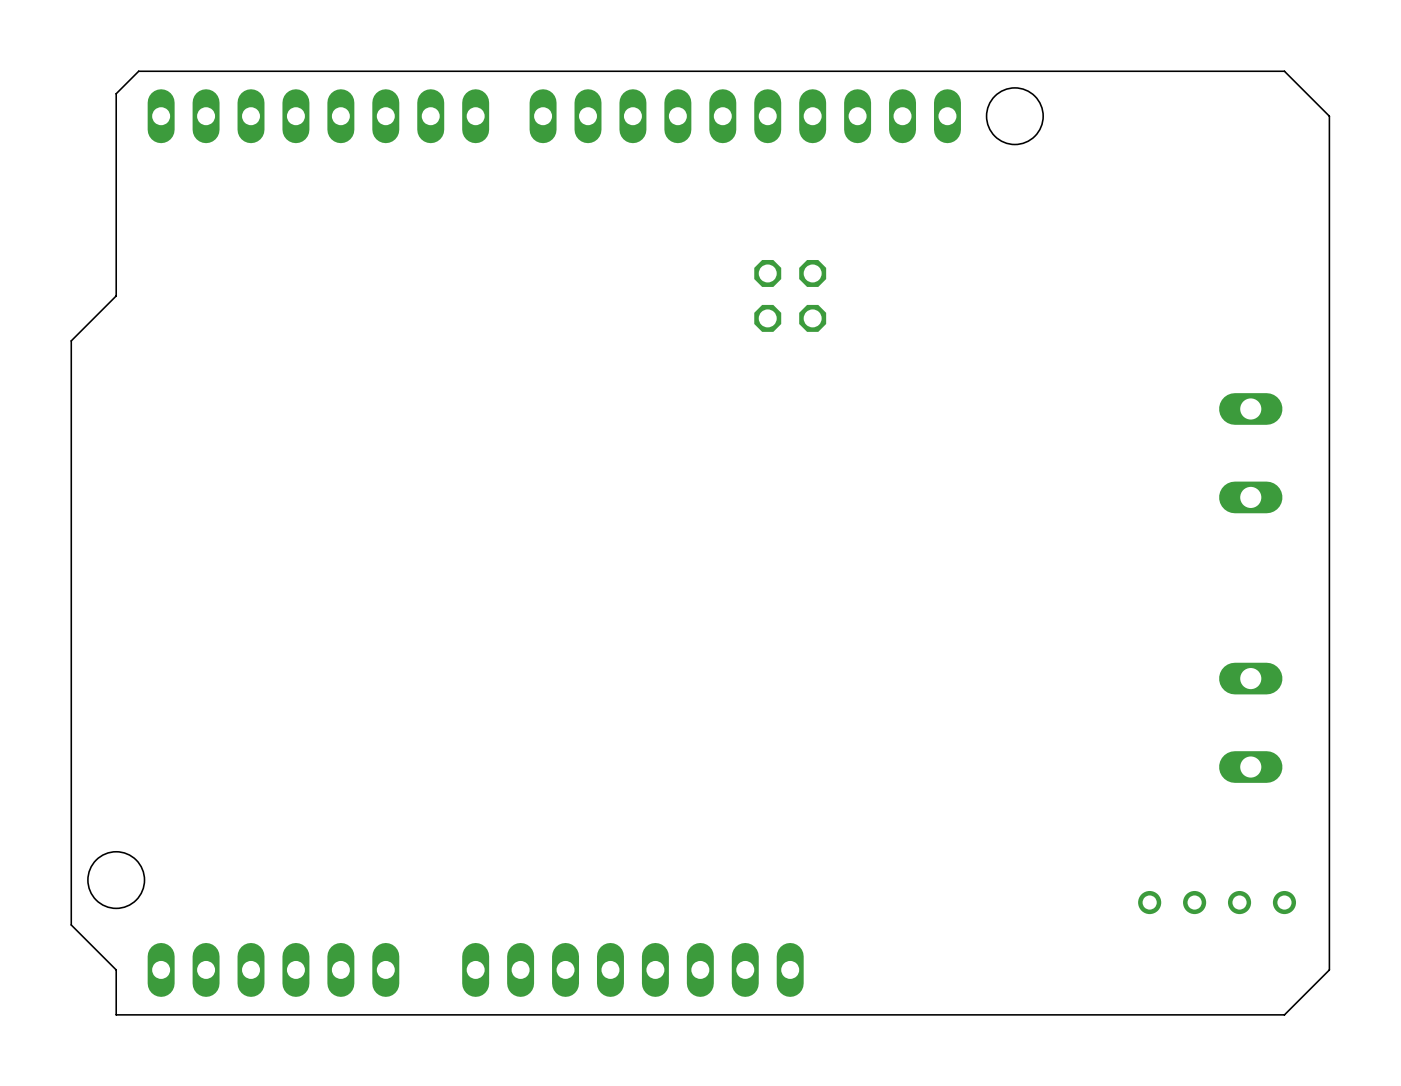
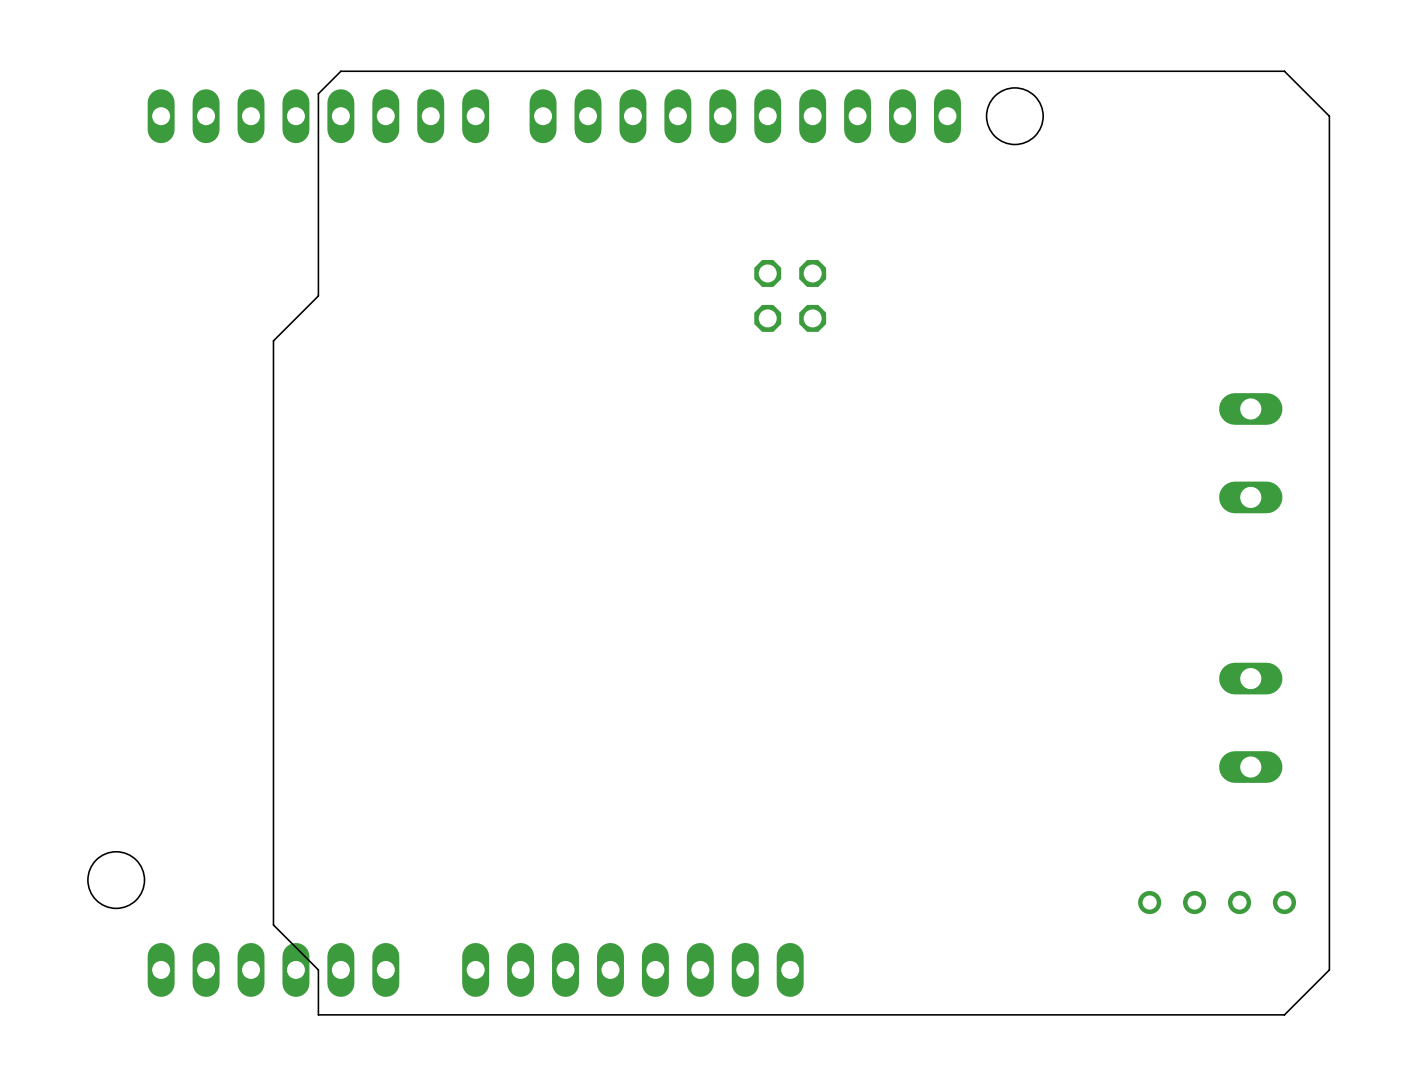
board edge: (340, 71) (138, 71) (116, 93) (116, 295) (71, 340) (71, 925) (116, 969) (116, 1014) (318, 1014) -> (340, 71) (318, 93) (318, 295) (273, 340) (273, 925) (318, 969) (318, 1014)

